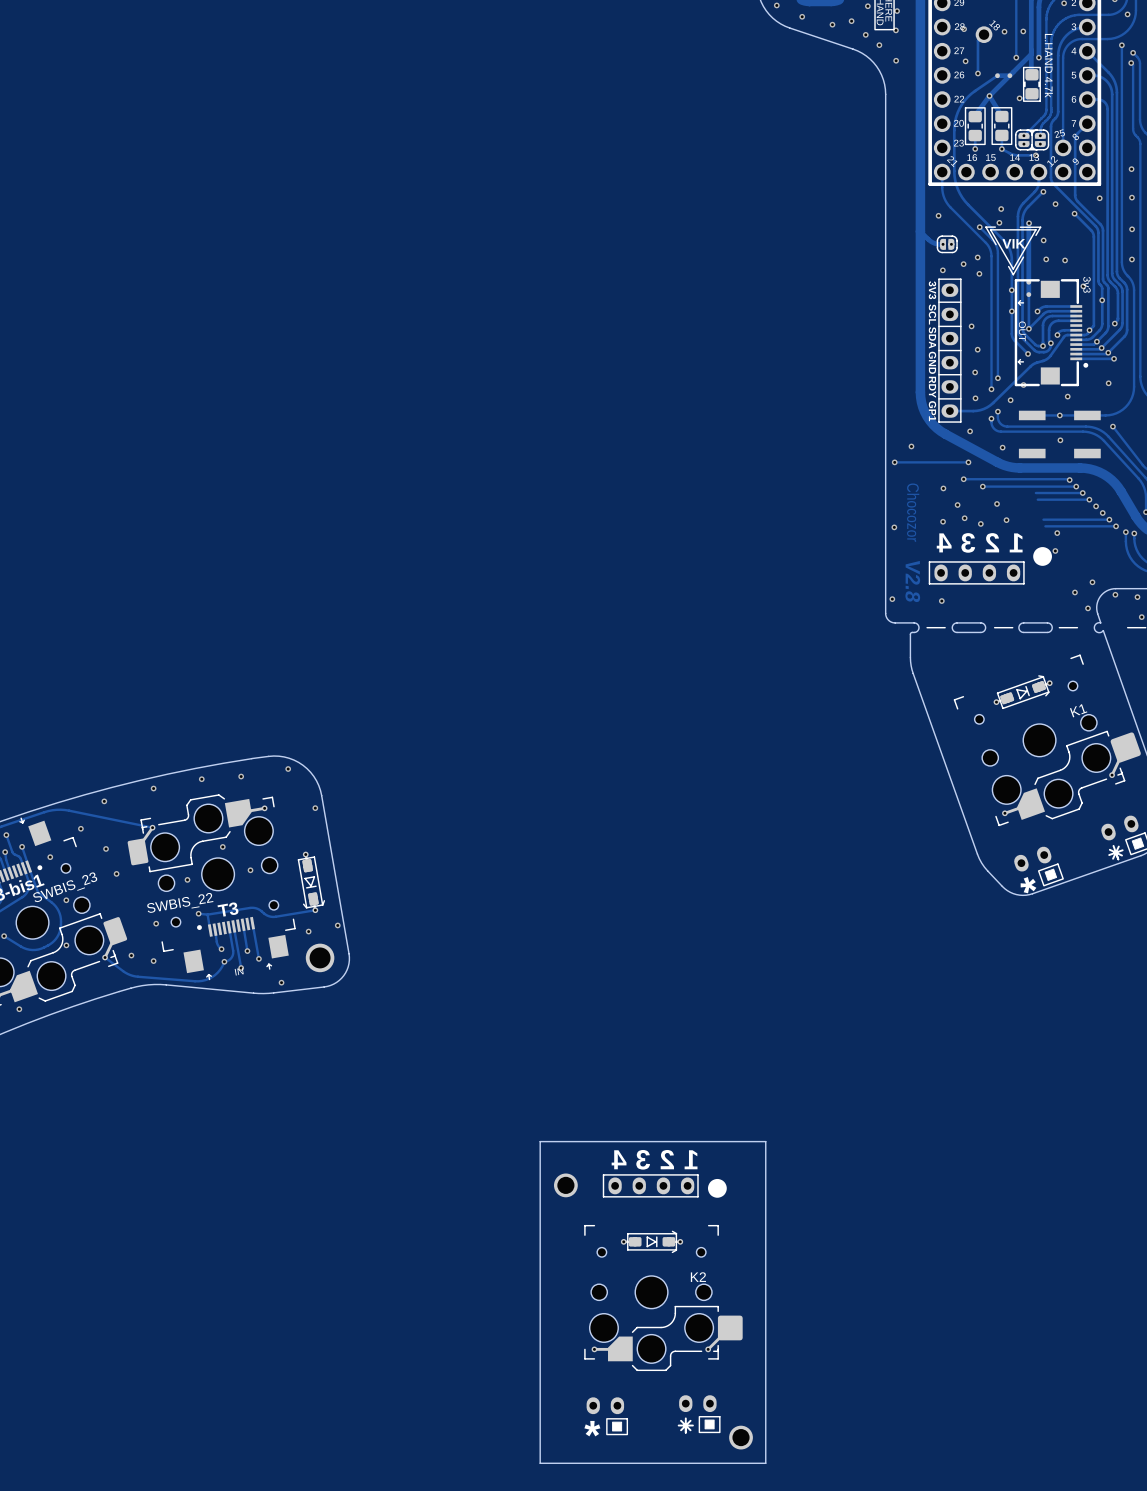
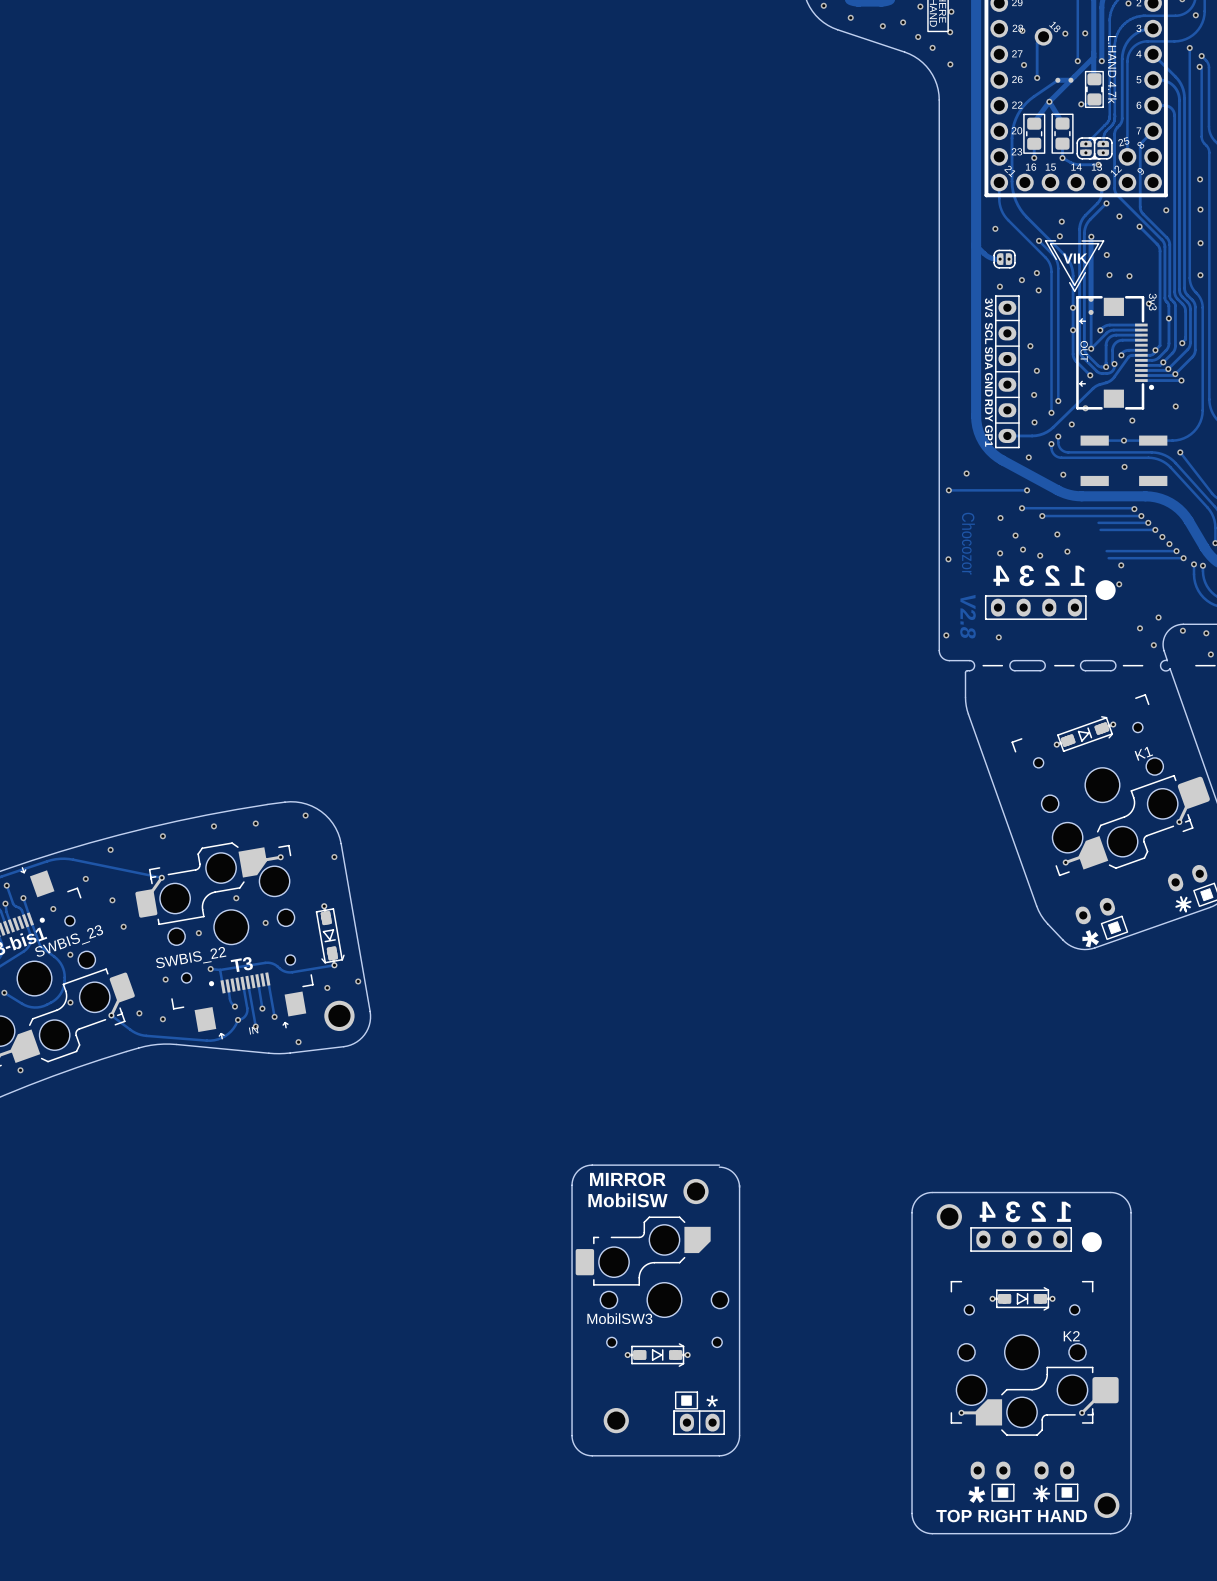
board edge: none -> (719, 1165) (589, 1165) (579, 1169) (574, 1176) (572, 1185) (572, 1435) (575, 1446) (581, 1452) (592, 1455) (719, 1455) (730, 1452) (736, 1446) (739, 1435) (739, 1185)
board edge: none -> (719, 1167) (726, 1168) (733, 1173) (737, 1178) (739, 1187)
text: none -> MIRROR (627, 1179)
part: none -> (696, 1191)
board edge: none -> (1110, 1192) (932, 1192) (921, 1195) (915, 1201) (912, 1212) (912, 1513) (914, 1522) (921, 1530) (932, 1533) (1110, 1533) (1121, 1530) (1127, 1524) (1131, 1513) (1131, 1212) (1129, 1203) (1125, 1198) (1117, 1193) (1110, 1192)
text: none -> MobilSW (628, 1200)
board edge: (765, 1141) (540, 1141) (540, 1463) (765, 1463) (765, 1141) -> none
part: none -> (949, 1216)
K2 footprint: [584, 1174, 743, 1436] -> [950, 1227, 1119, 1503]
part: (565, 1185) -> none
MobilSW3: none -> (652, 1281)
part: none -> (657, 1355)
part: none -> (699, 1413)
part: none -> (616, 1420)
part: none -> (1106, 1505)
text: none -> TOP RIGHT HAND (1011, 1516)
part: (741, 1437) -> none

